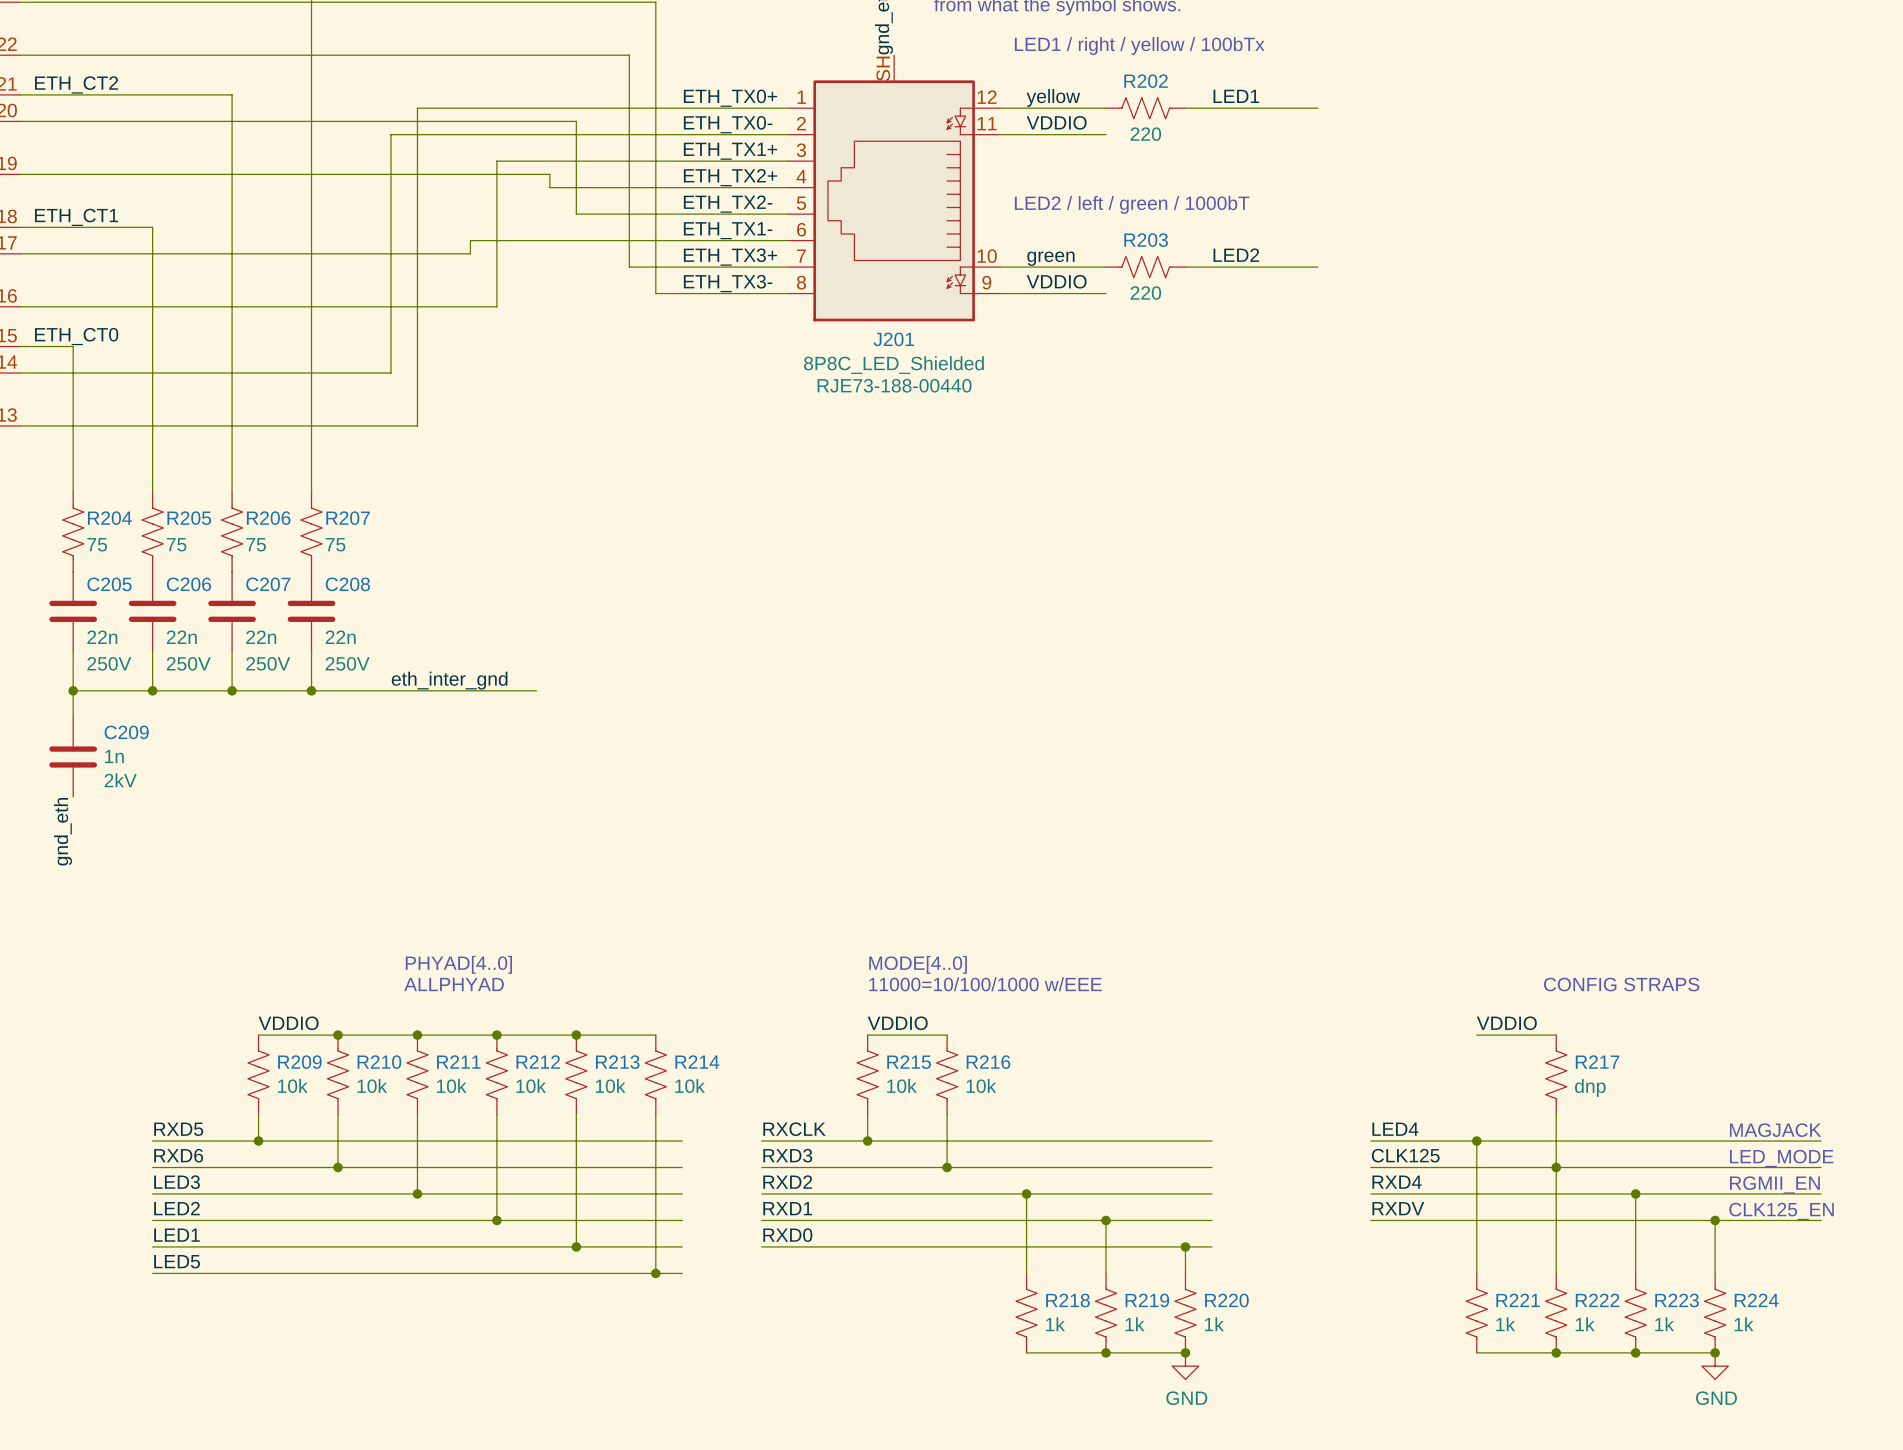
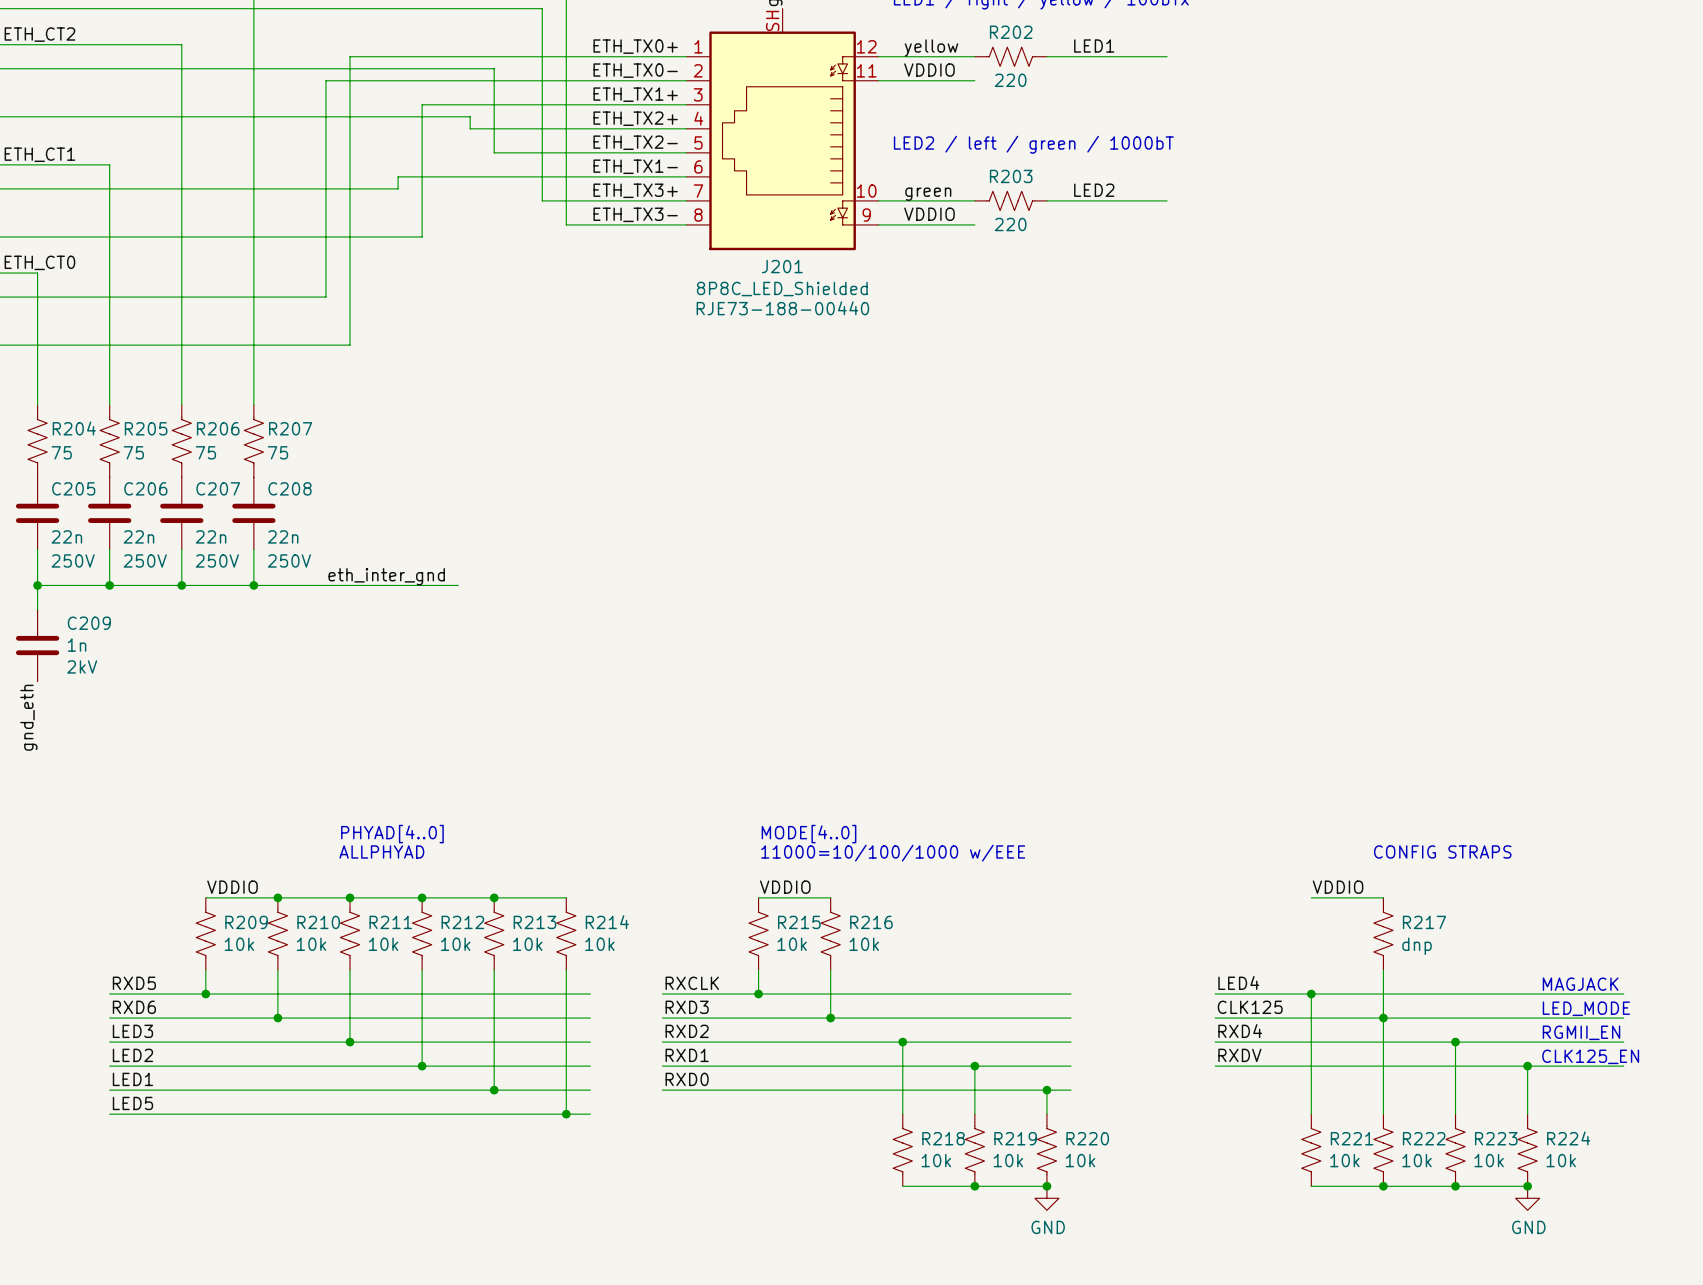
R218 value: 1k (1055, 1324) -> 10k (936, 1160)
R219 value: 1k (1134, 1324) -> 10k (1008, 1160)
R220 value: 1k (1214, 1324) -> 10k (1080, 1160)
R221 value: 1k (1505, 1324) -> 10k (1344, 1160)
R222 value: 1k (1585, 1324) -> 10k (1417, 1160)
R223 value: 1k (1664, 1324) -> 10k (1489, 1160)
R224 value: 1k (1744, 1324) -> 10k (1561, 1160)

